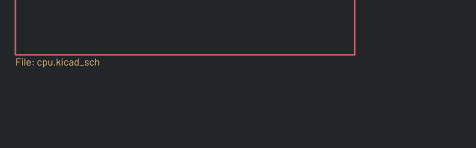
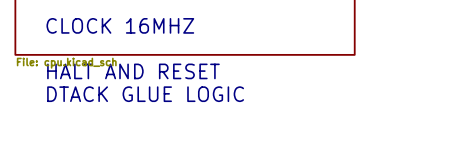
text: none -> CLOCK 16MHZ (120, 25)
text: none -> HALT AND RESET (133, 71)
text: none -> DTACK GLUE LOGIC (145, 94)

